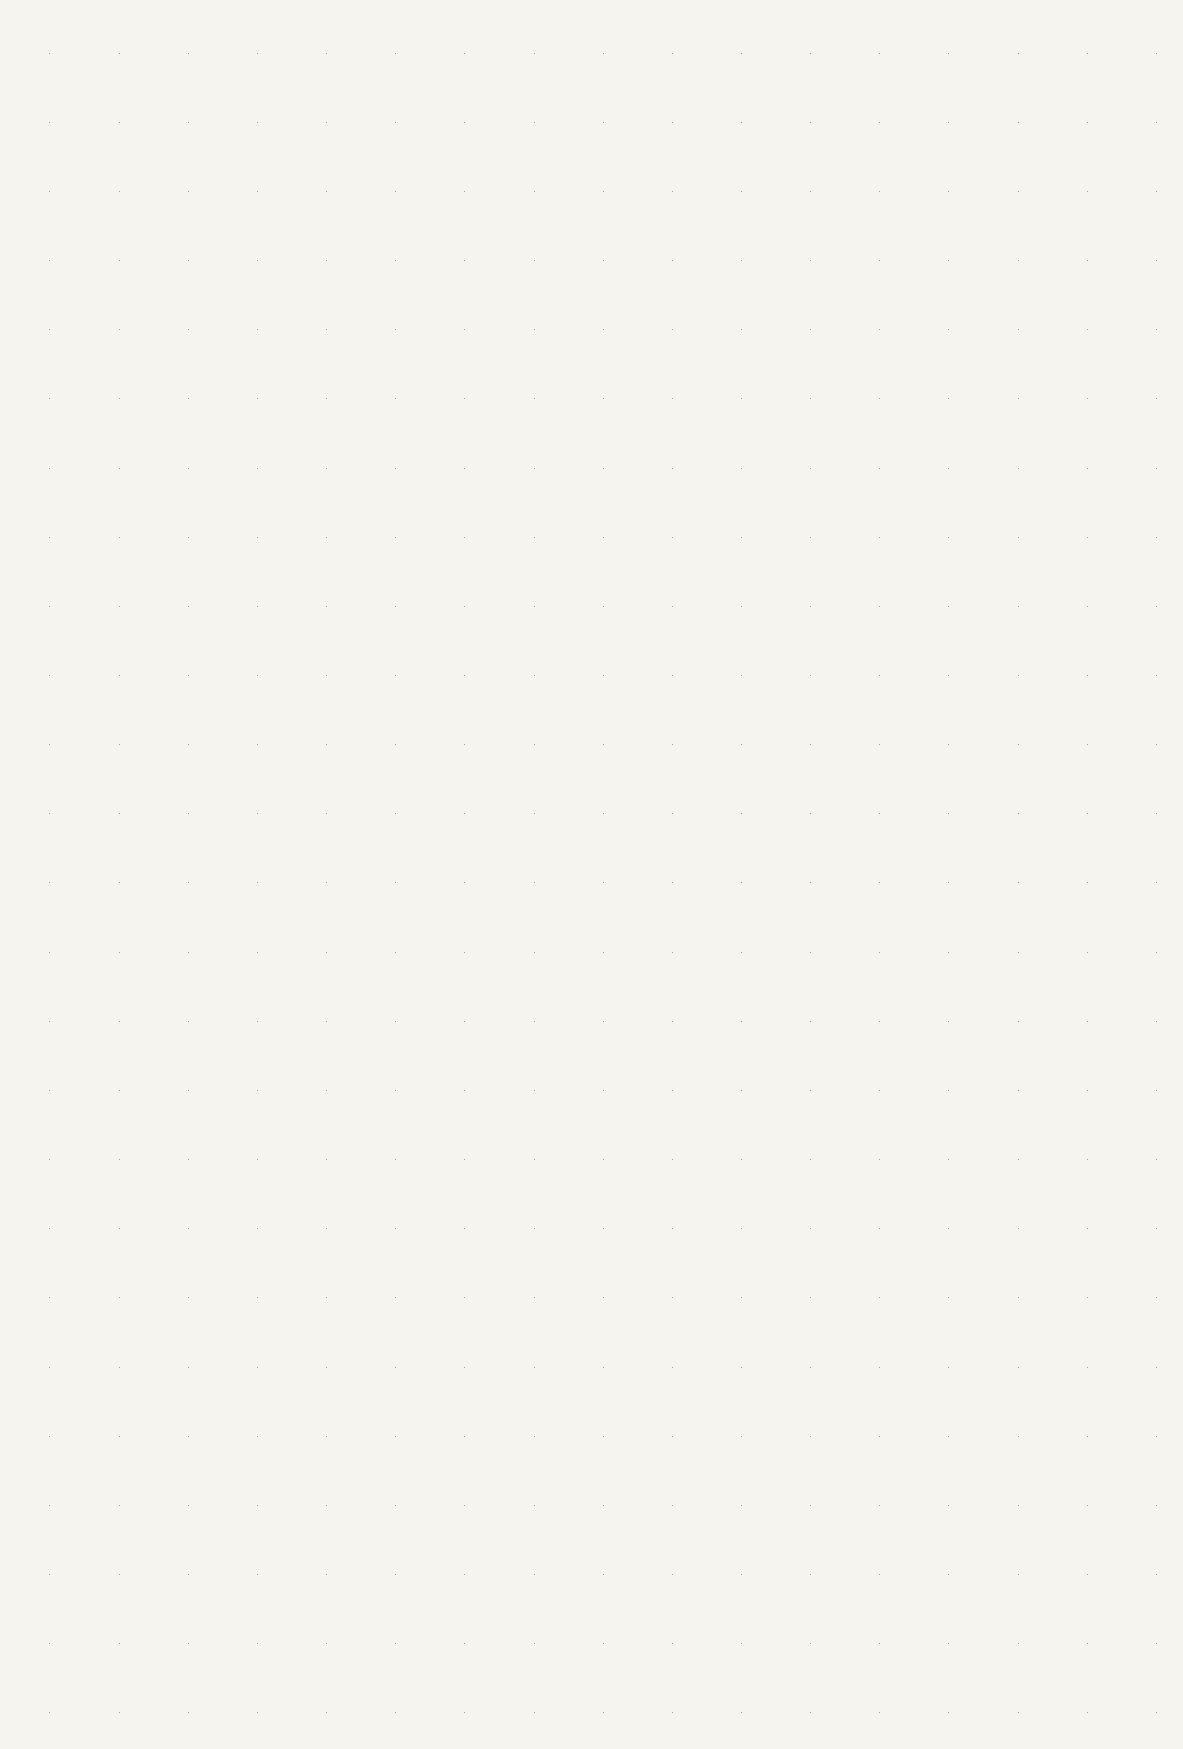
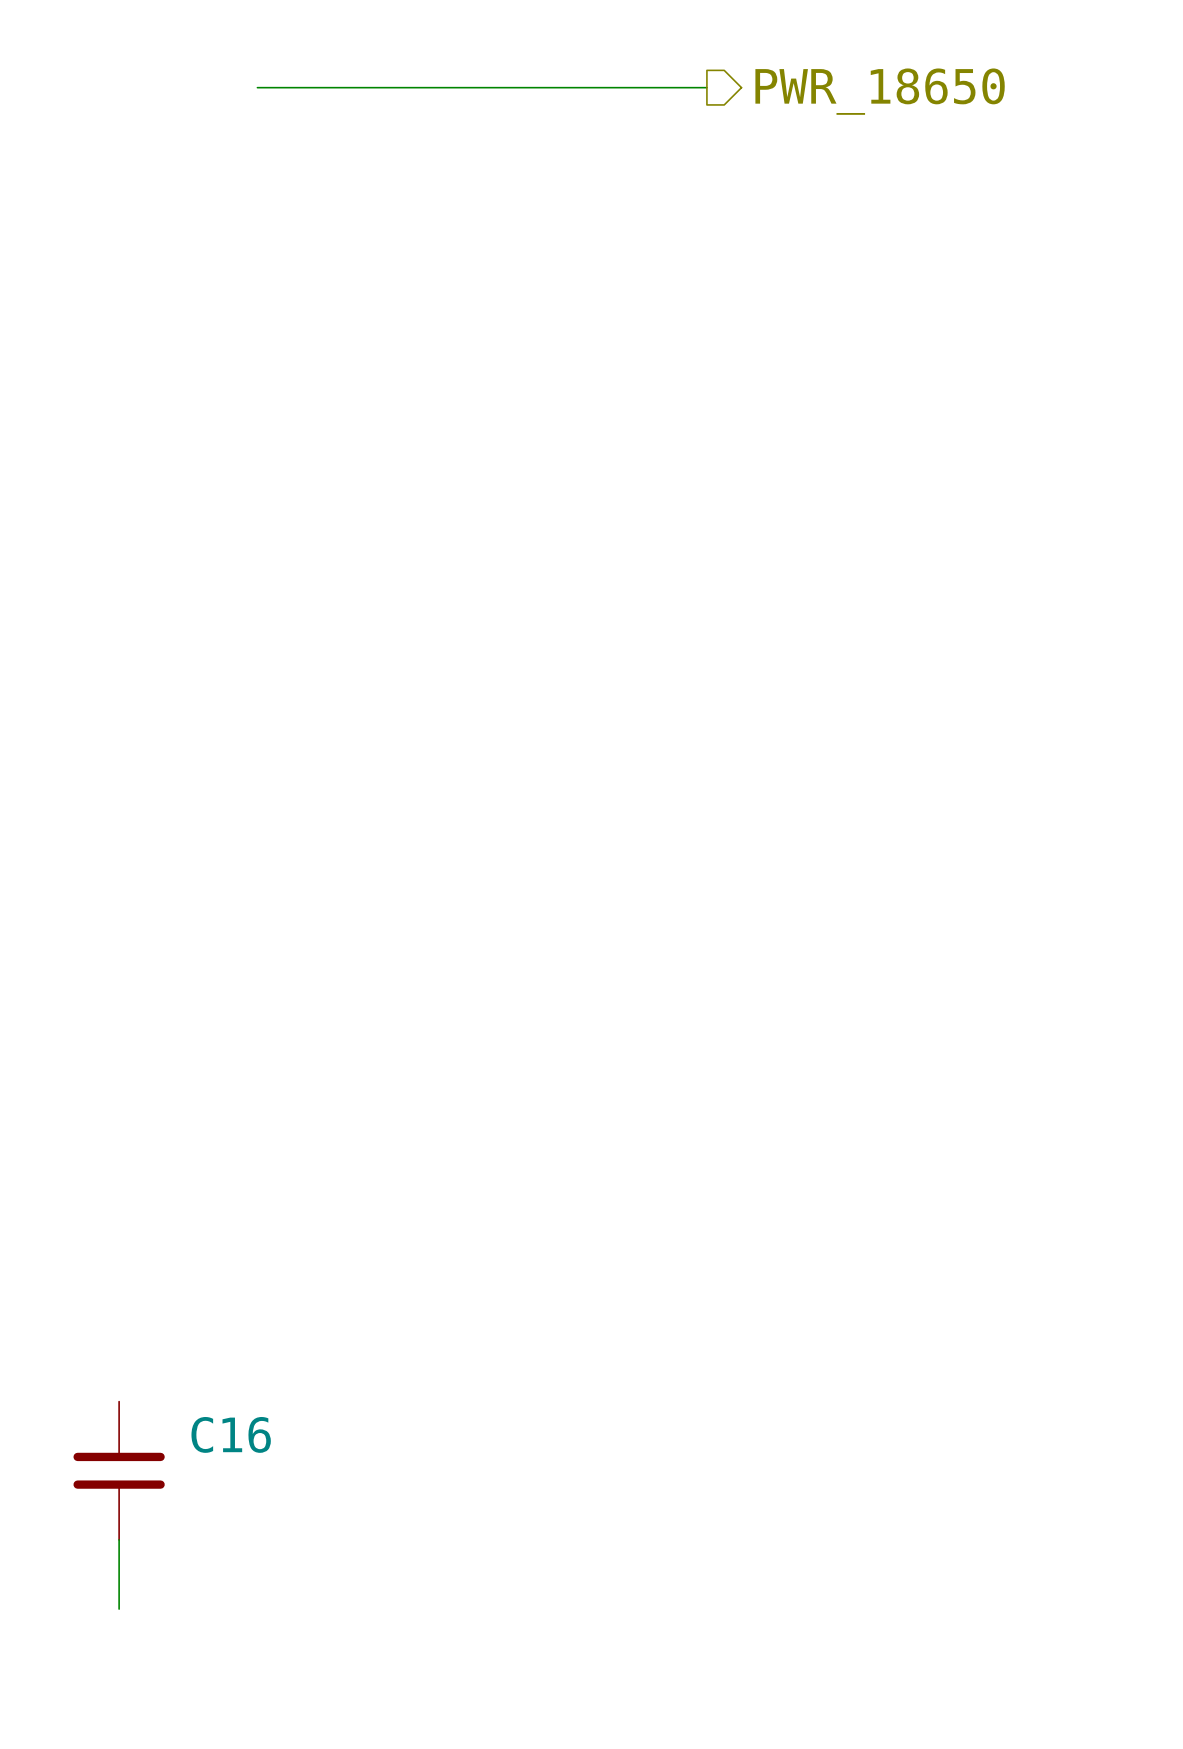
wire: none -> (257, 87) (706, 87)
hierarchical label: none -> PWR_18650 (880, 91)
C16: none -> (119, 1470)
wire: none -> (119, 1539) (119, 1609)

